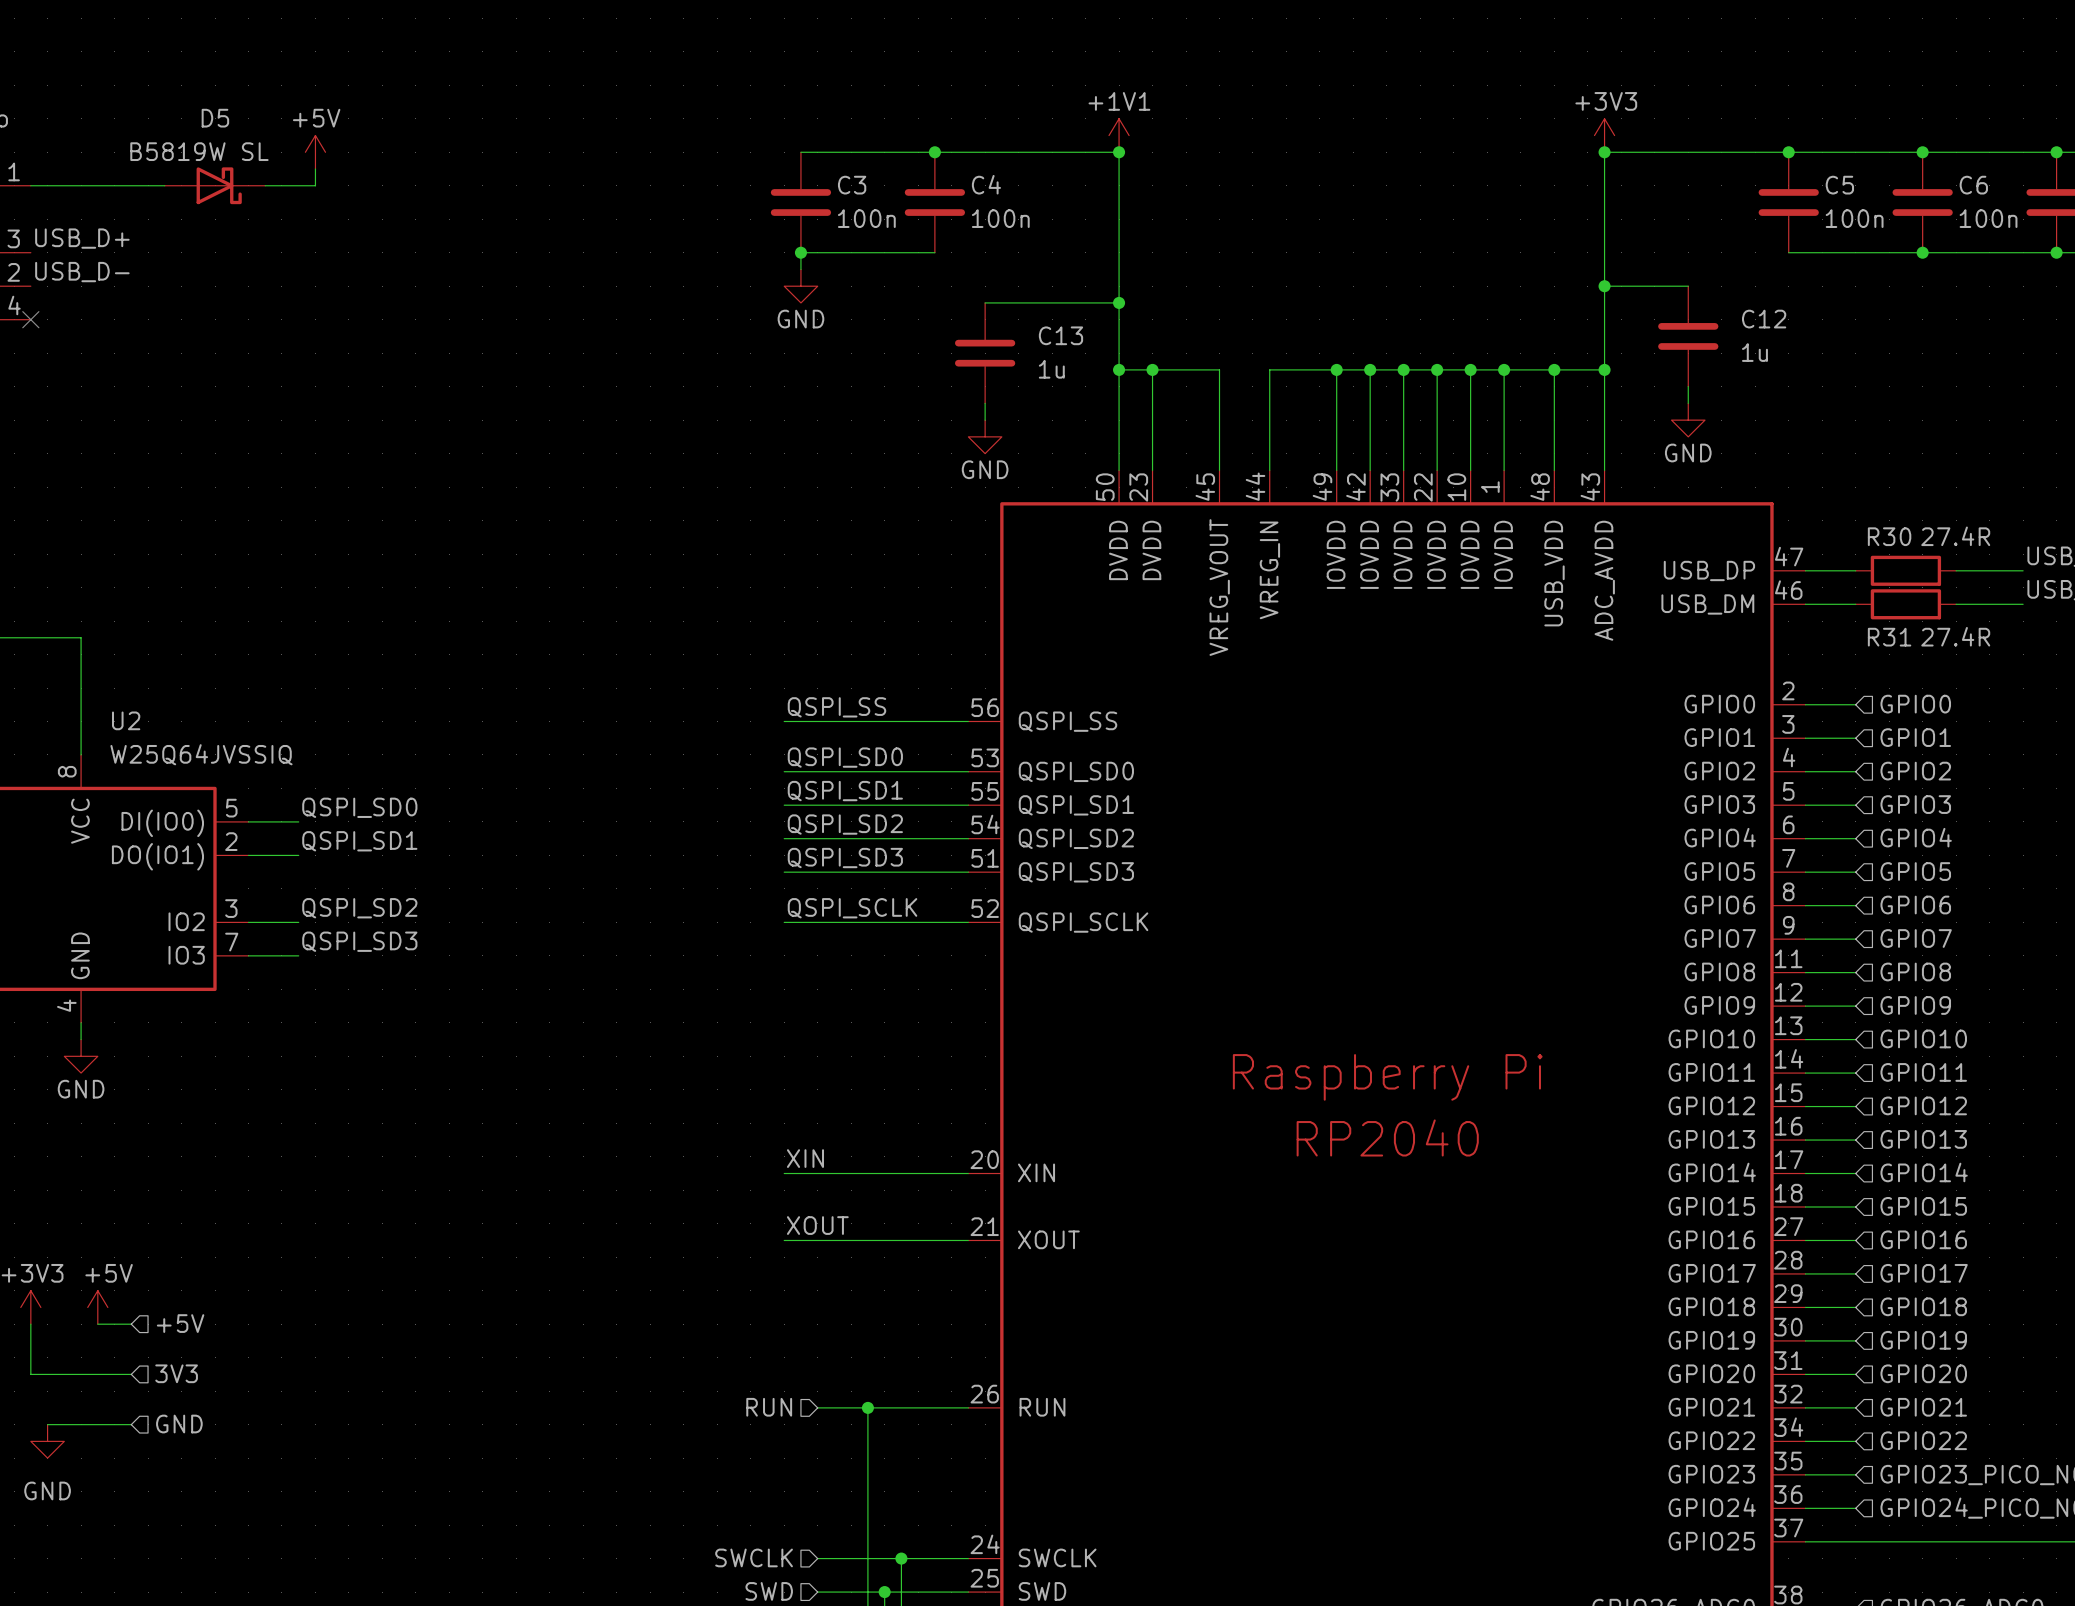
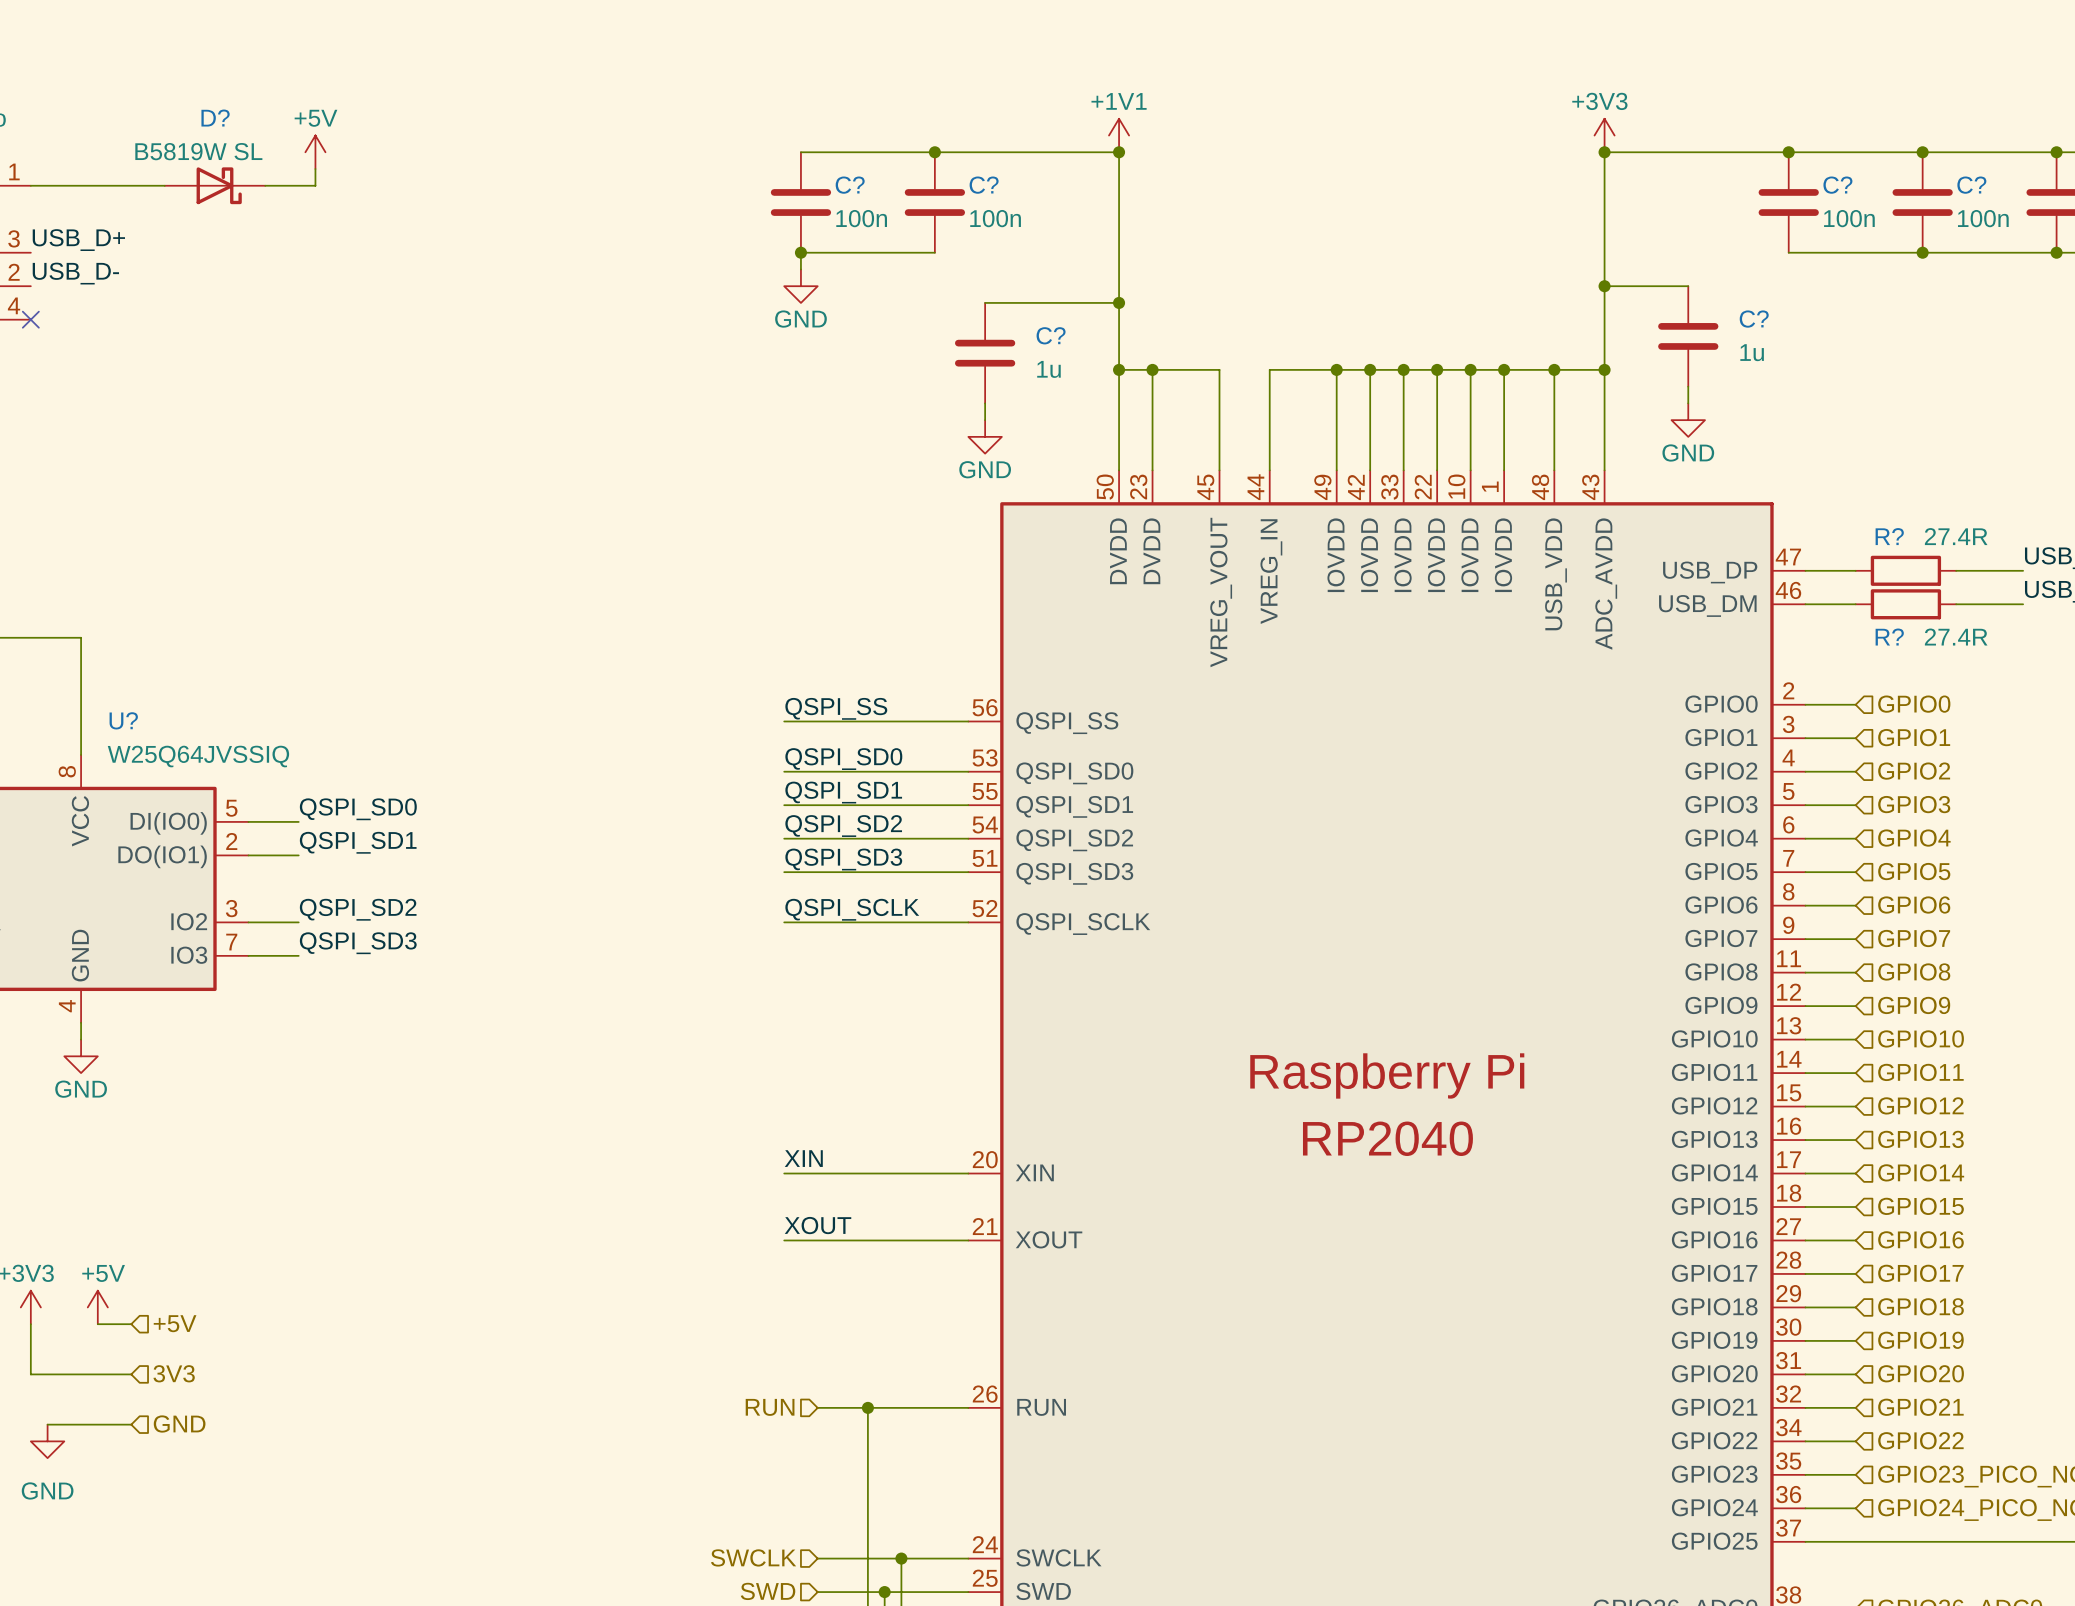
D5 name: D5 (215, 118) -> D? (215, 118)
C4 name: C4 (986, 184) -> C? (984, 185)
C3 name: C3 (852, 185) -> C? (850, 185)
C5 name: C5 (1839, 185) -> C? (1837, 185)
C6 name: C6 (1973, 185) -> C? (1971, 185)
C12 name: C12 (1764, 319) -> C? (1754, 319)
C13 name: C13 (1060, 335) -> C? (1051, 335)
R30 name: R30 (1889, 536) -> R? (1889, 536)
R31 name: R31 (1889, 637) -> R? (1889, 637)
U2 name: U2 (126, 720) -> U? (123, 720)

